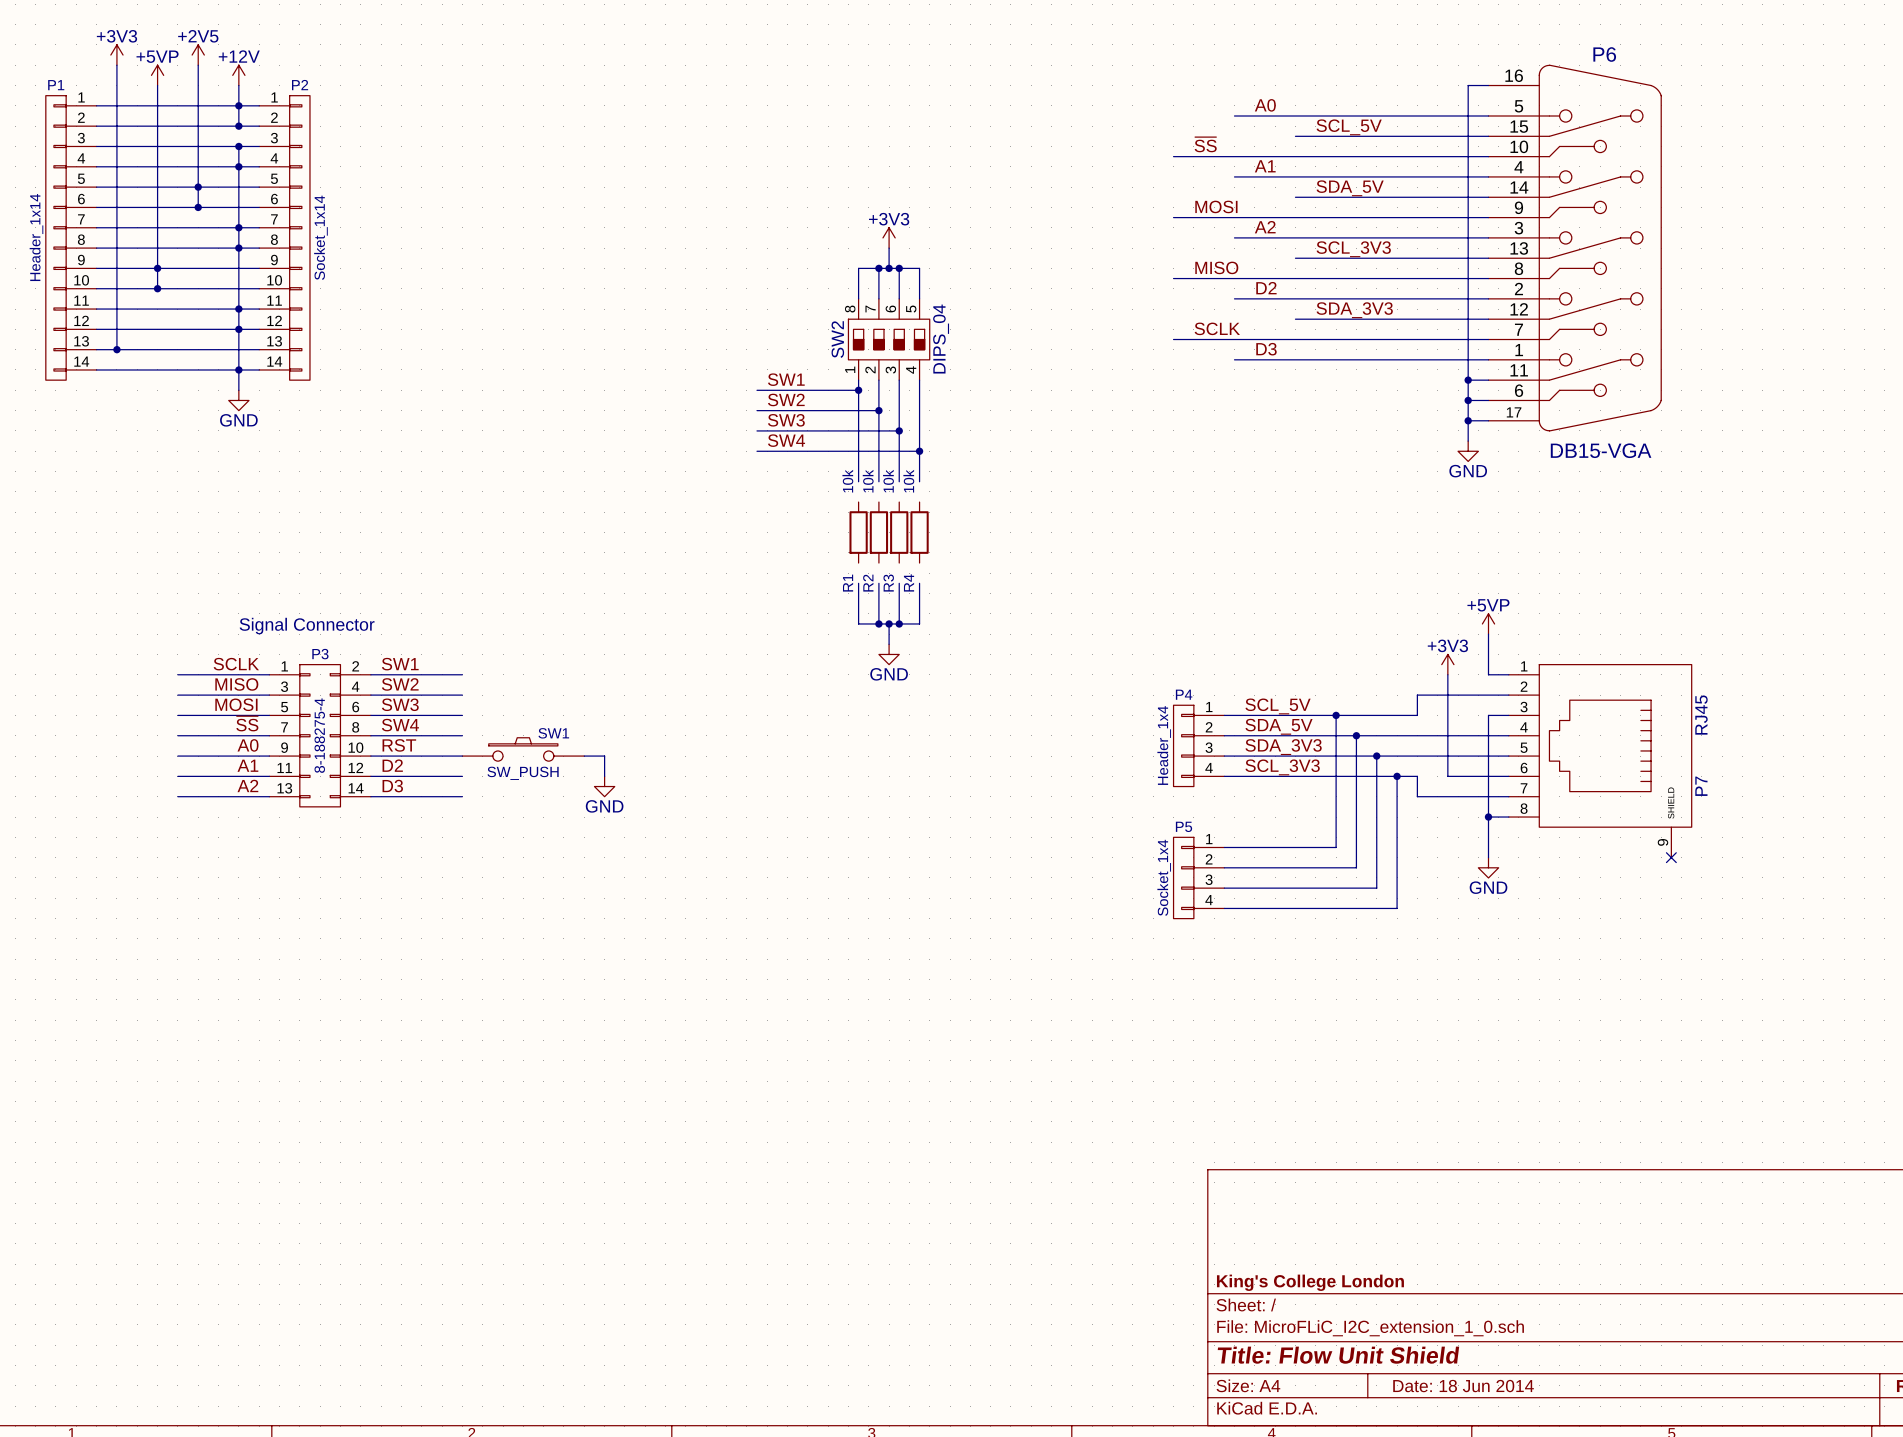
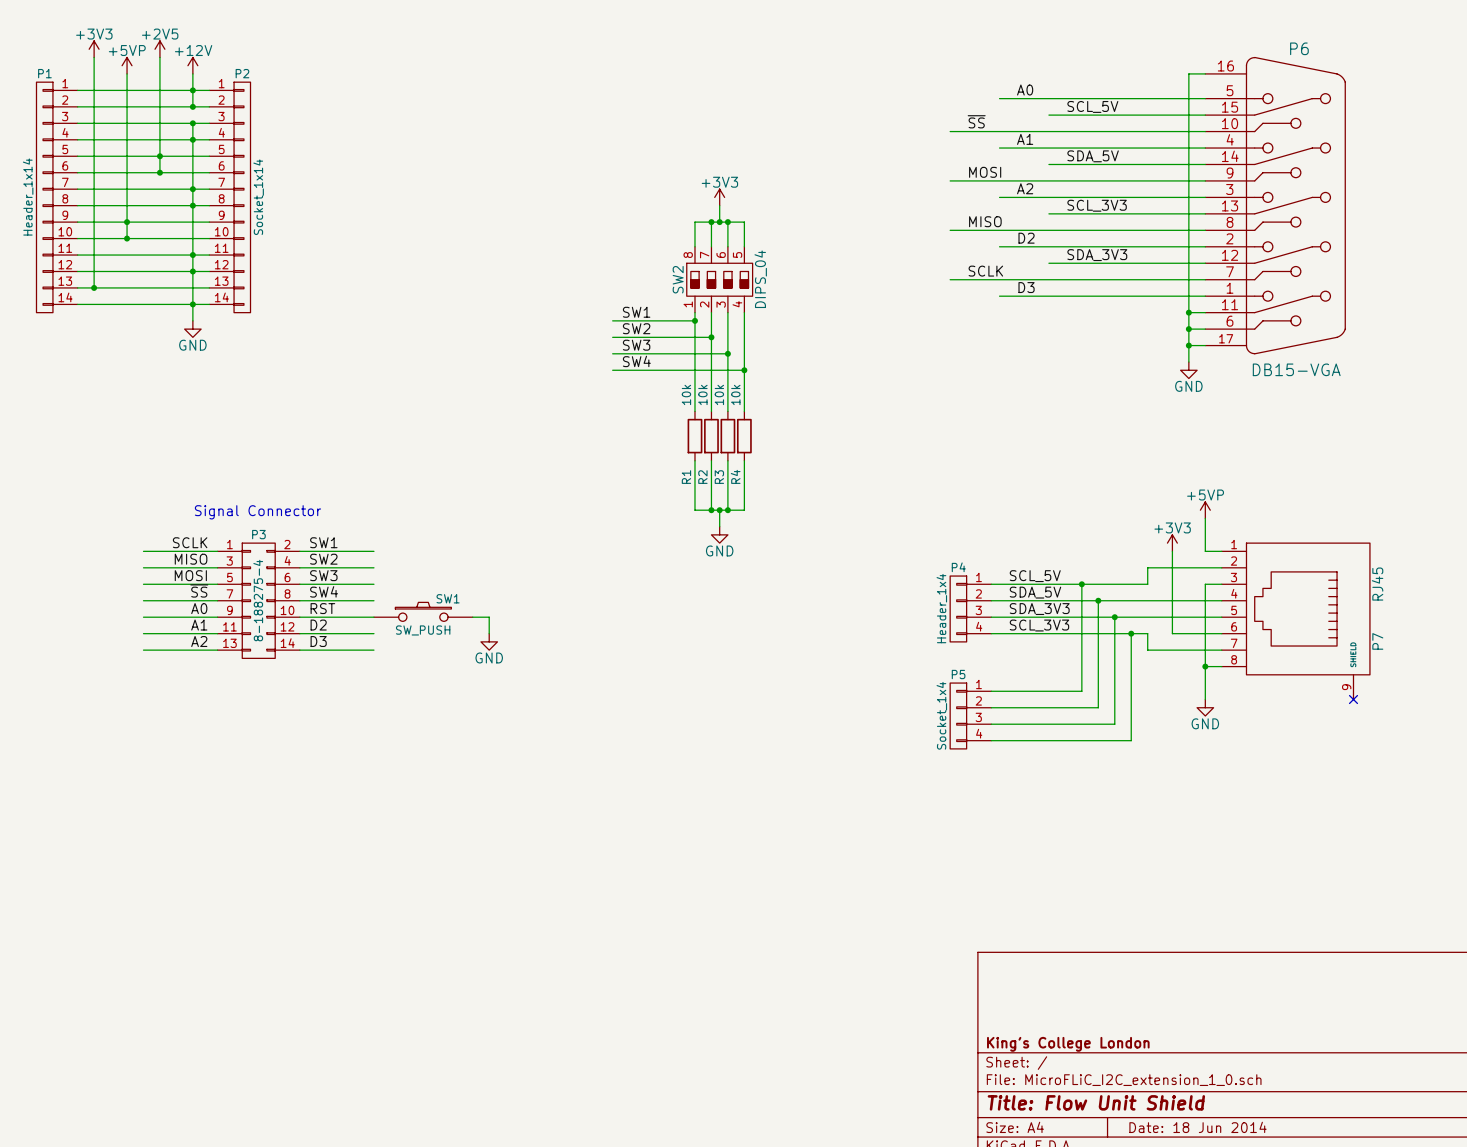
wire: none -> (694, 394) (694, 411)
wire: none -> (711, 394) (711, 411)
wire: none -> (727, 394) (727, 411)
wire: none -> (744, 394) (744, 411)
wire: none -> (694, 460) (694, 477)
wire: none -> (711, 460) (711, 477)
wire: none -> (727, 460) (727, 477)
wire: none -> (744, 460) (744, 477)

